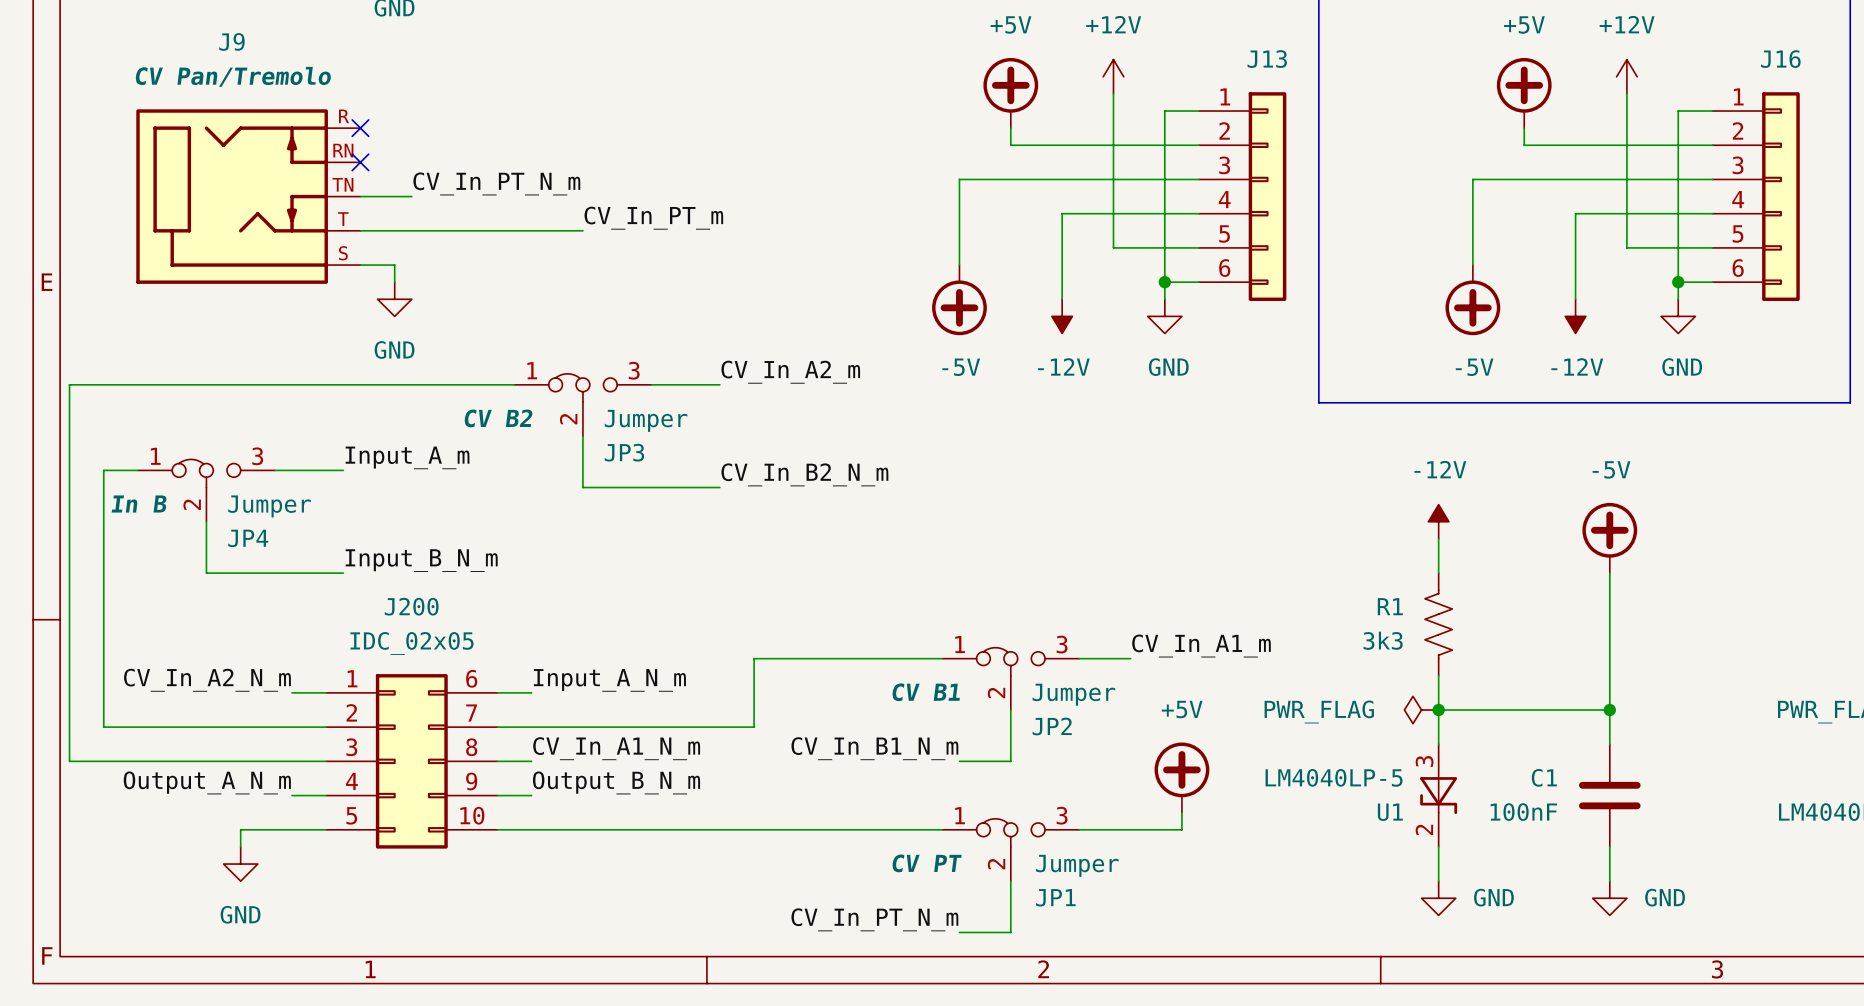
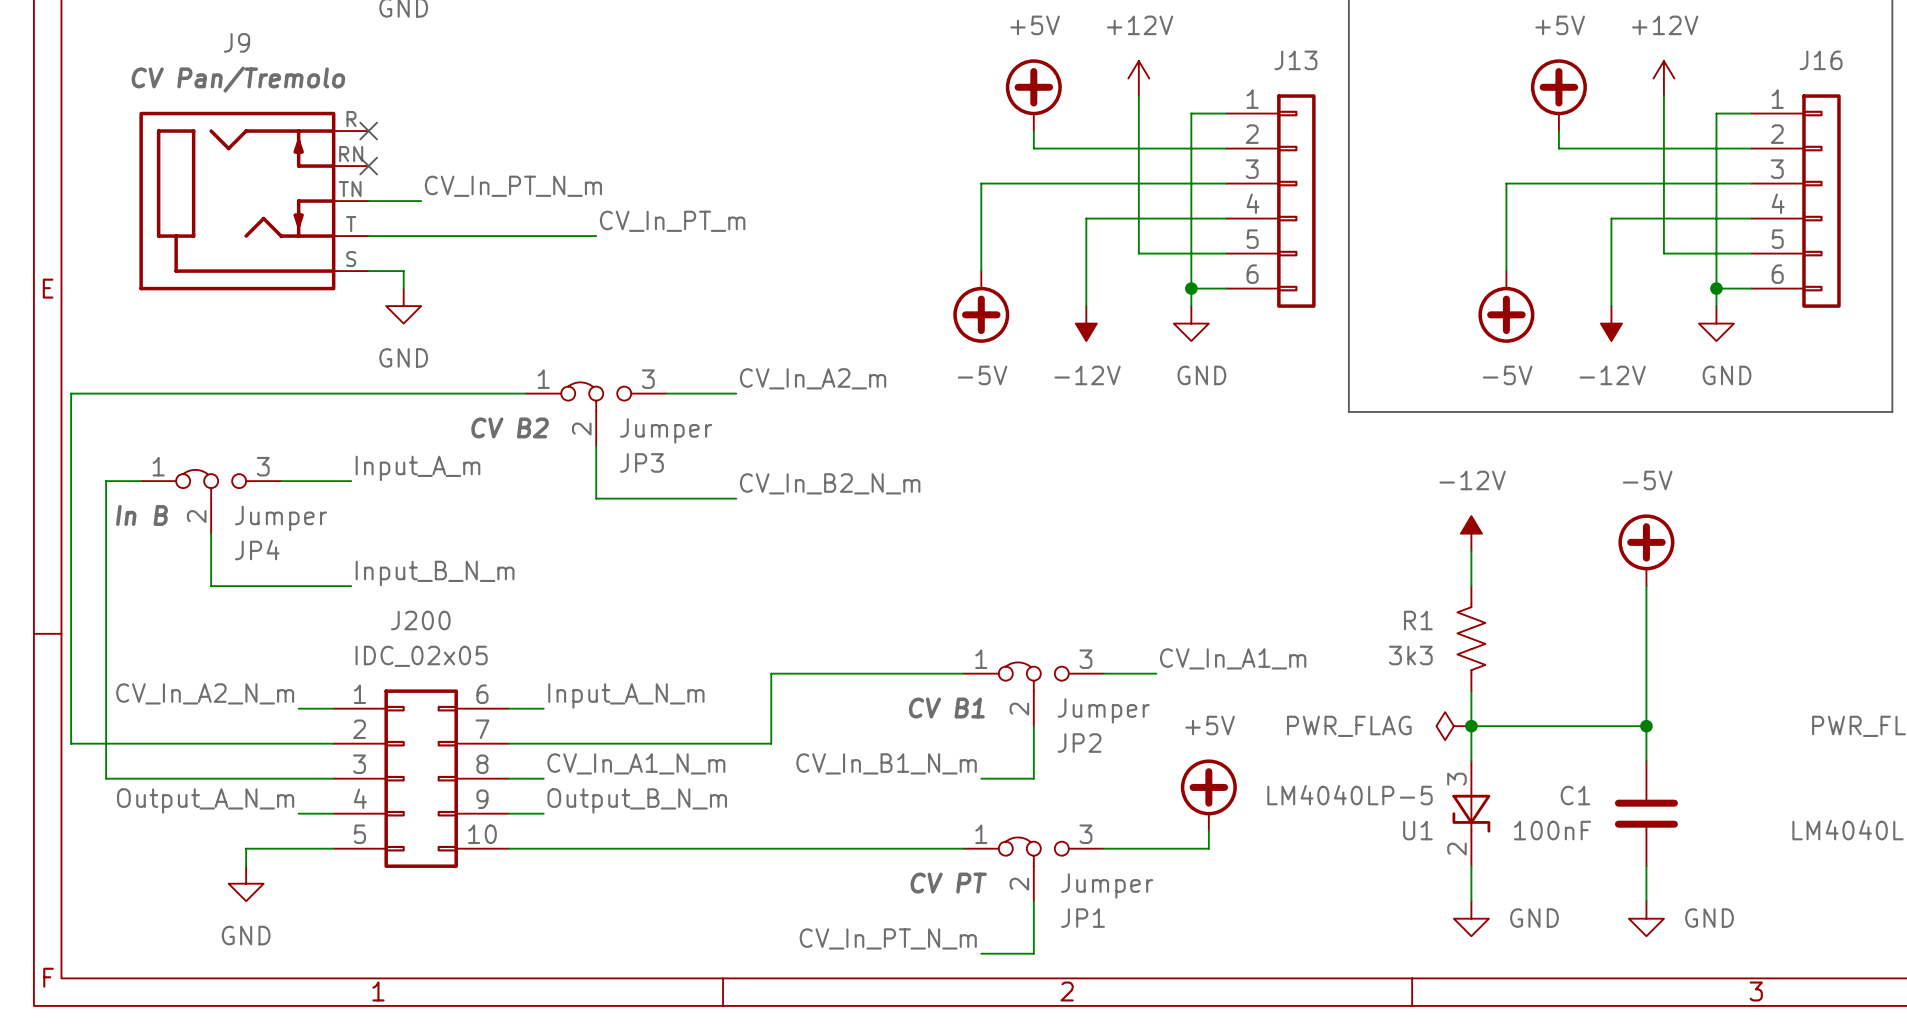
wire: (69, 727) (69, 761) (103, 761) -> (71, 743) (106, 743) (106, 778)

